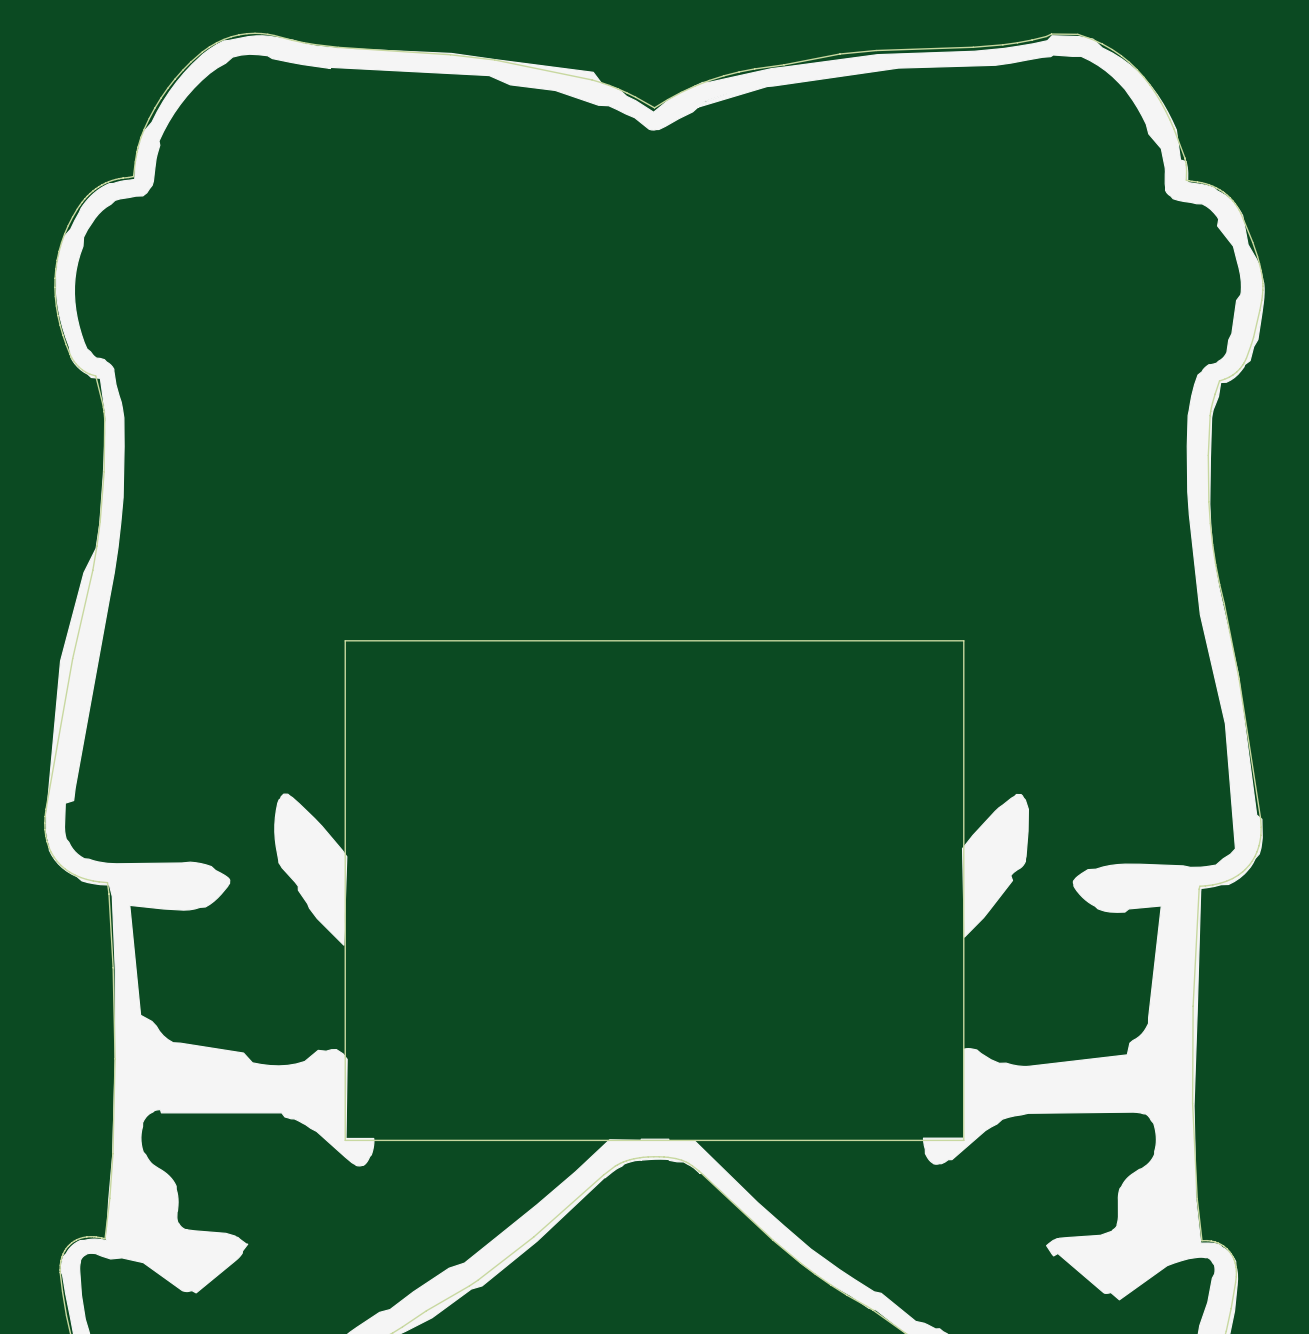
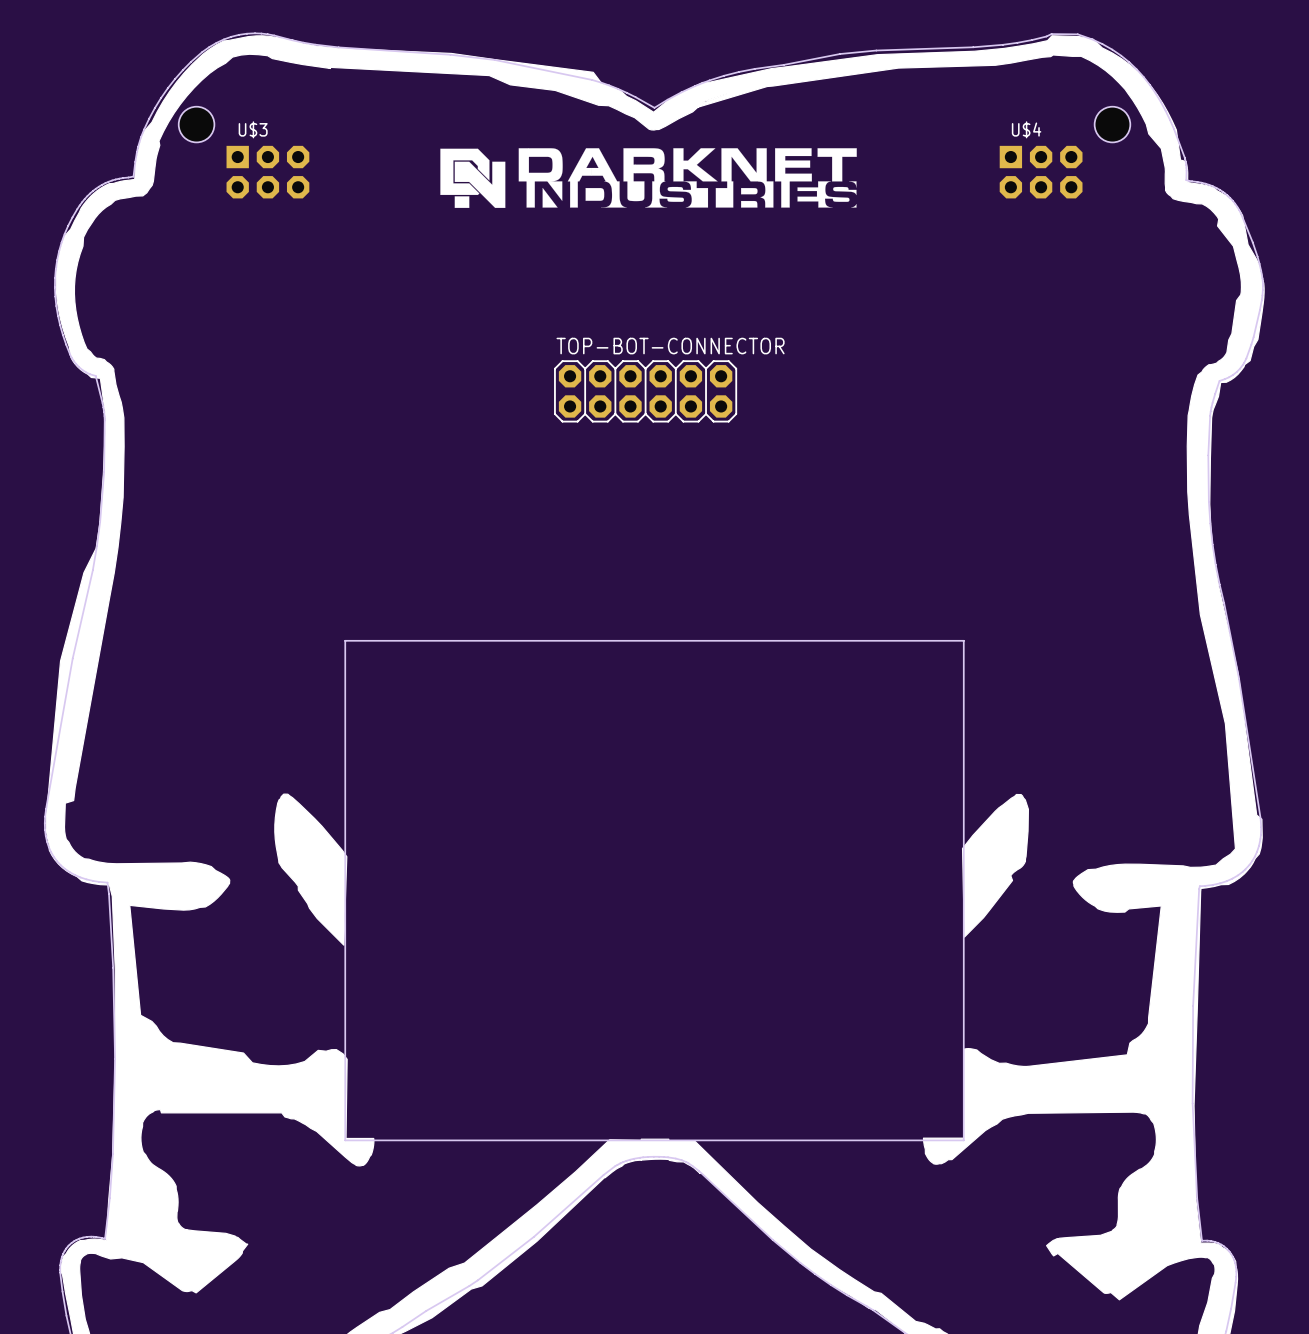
hole: none -> (196, 124)
hole: none -> (1112, 124)
drawing: none -> [440, 148, 857, 208]
U$3: none -> (267, 172)
U$4: none -> (1041, 172)
TOP-BOT-CONNECTOR: none -> (645, 391)

